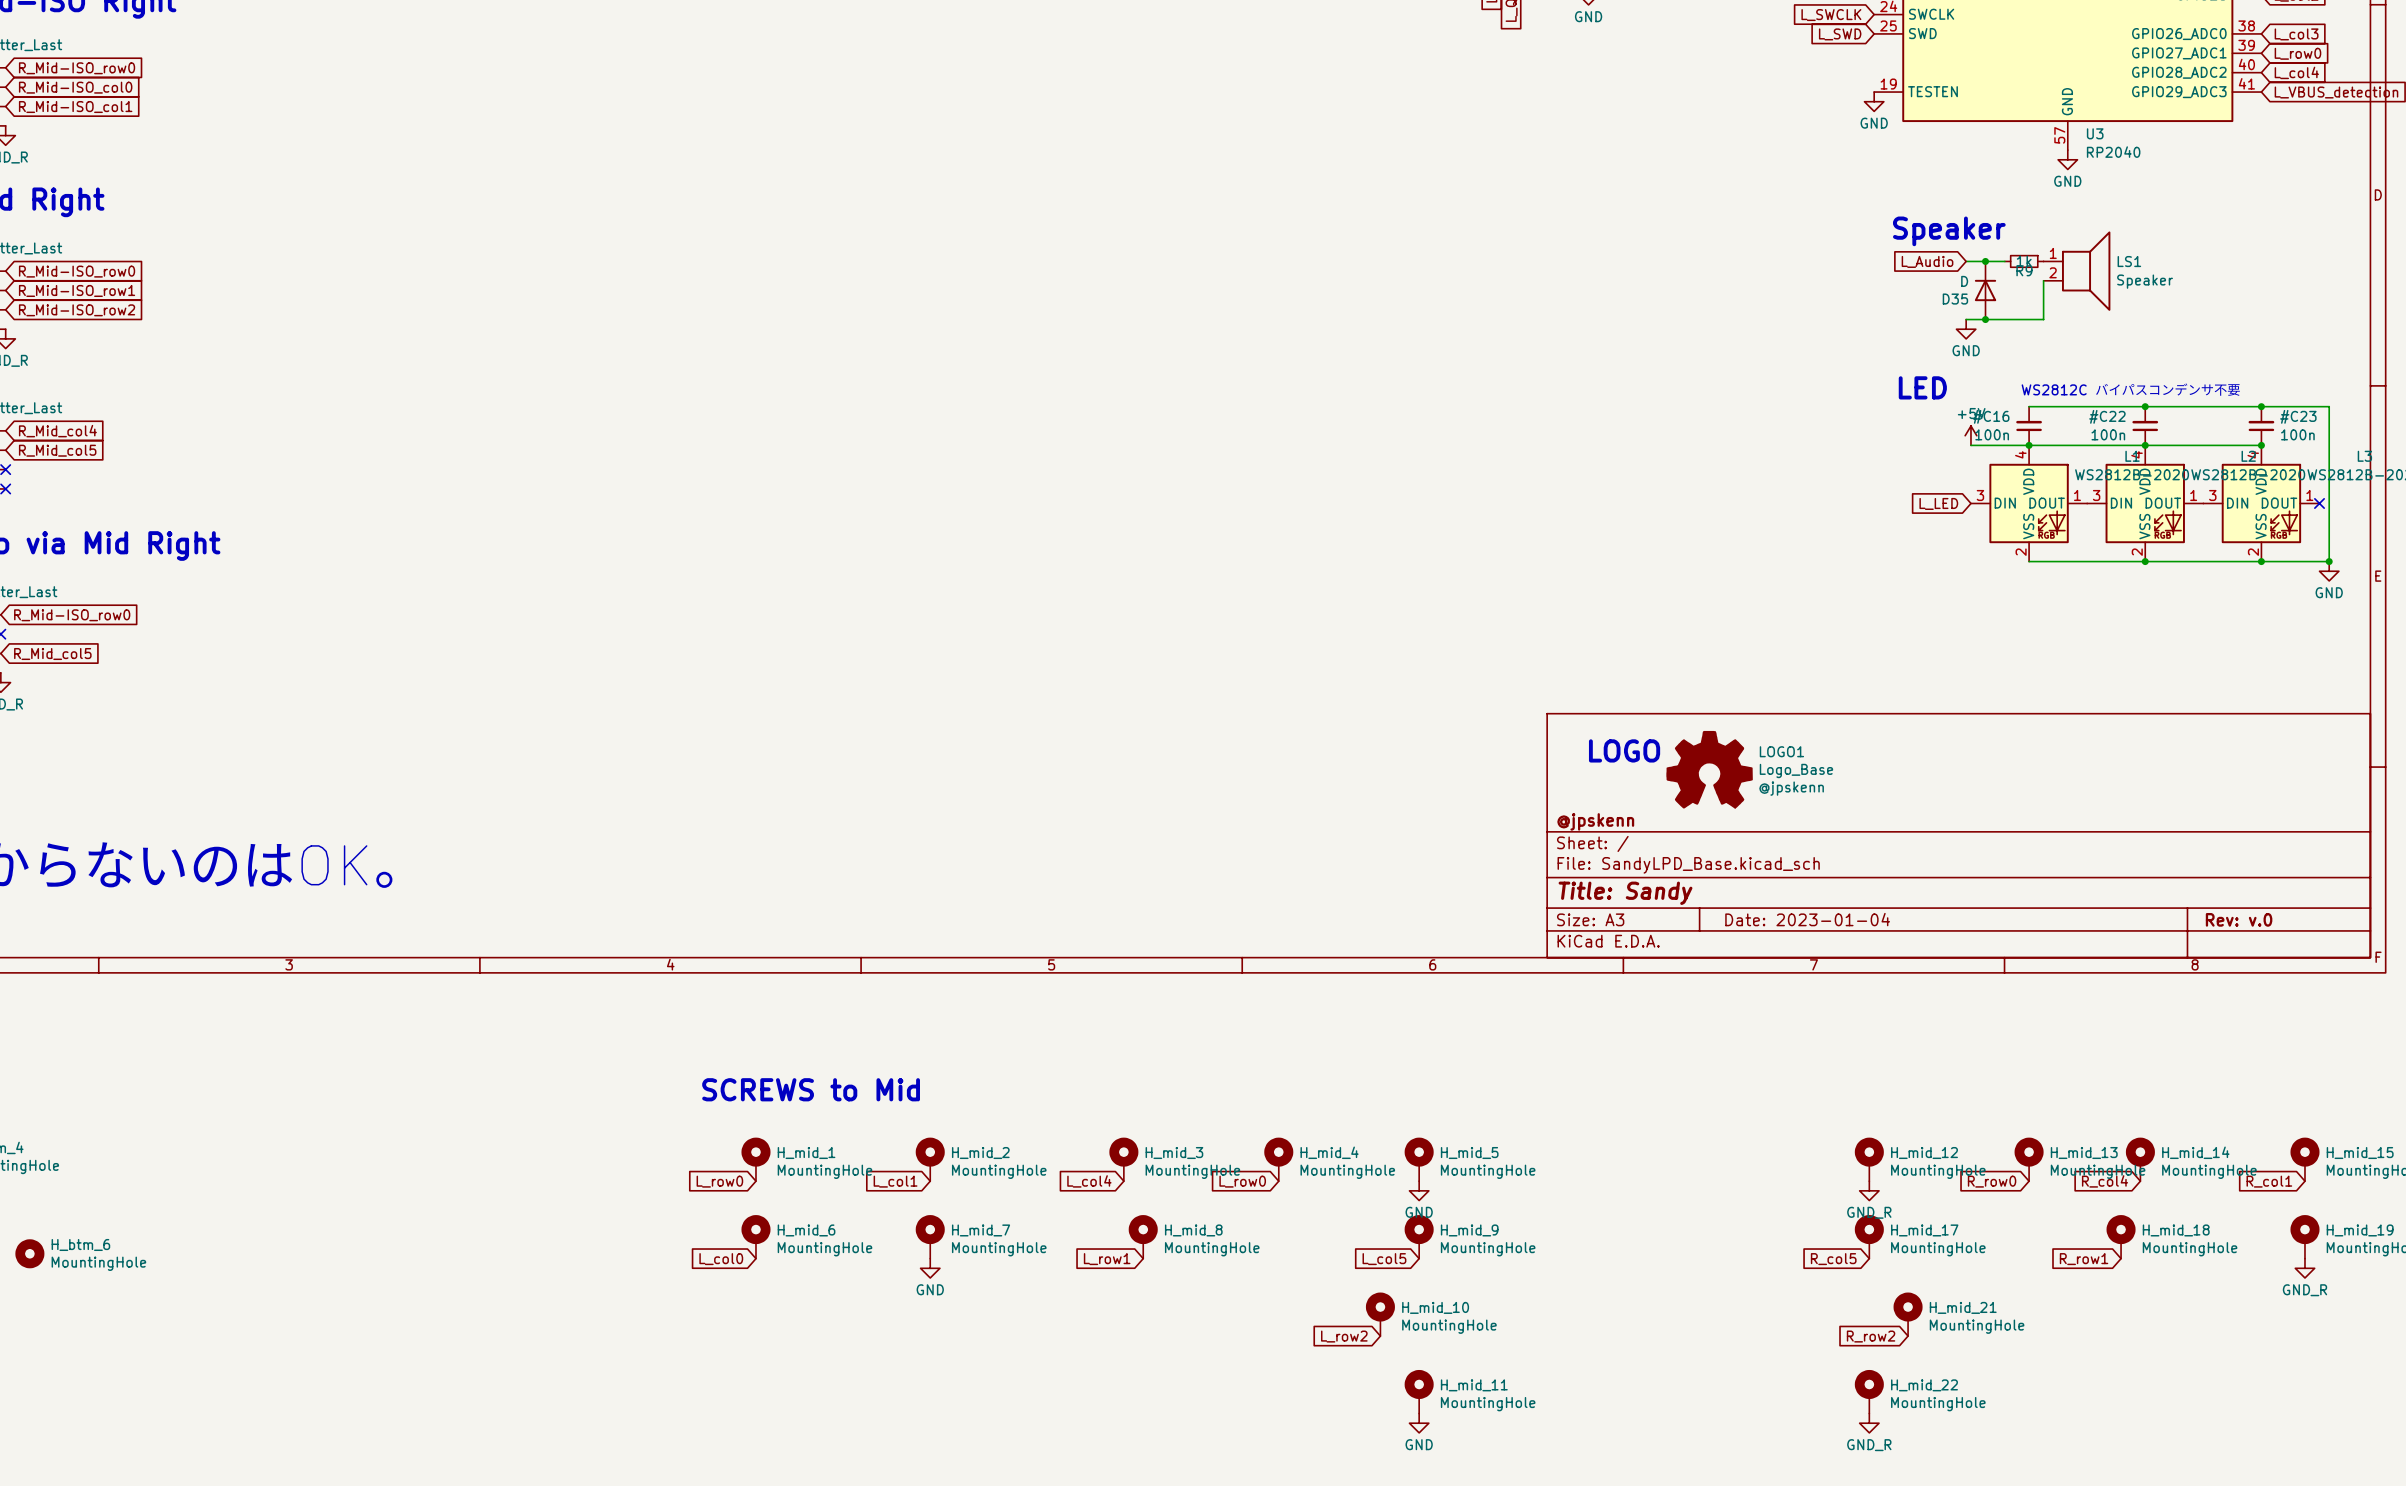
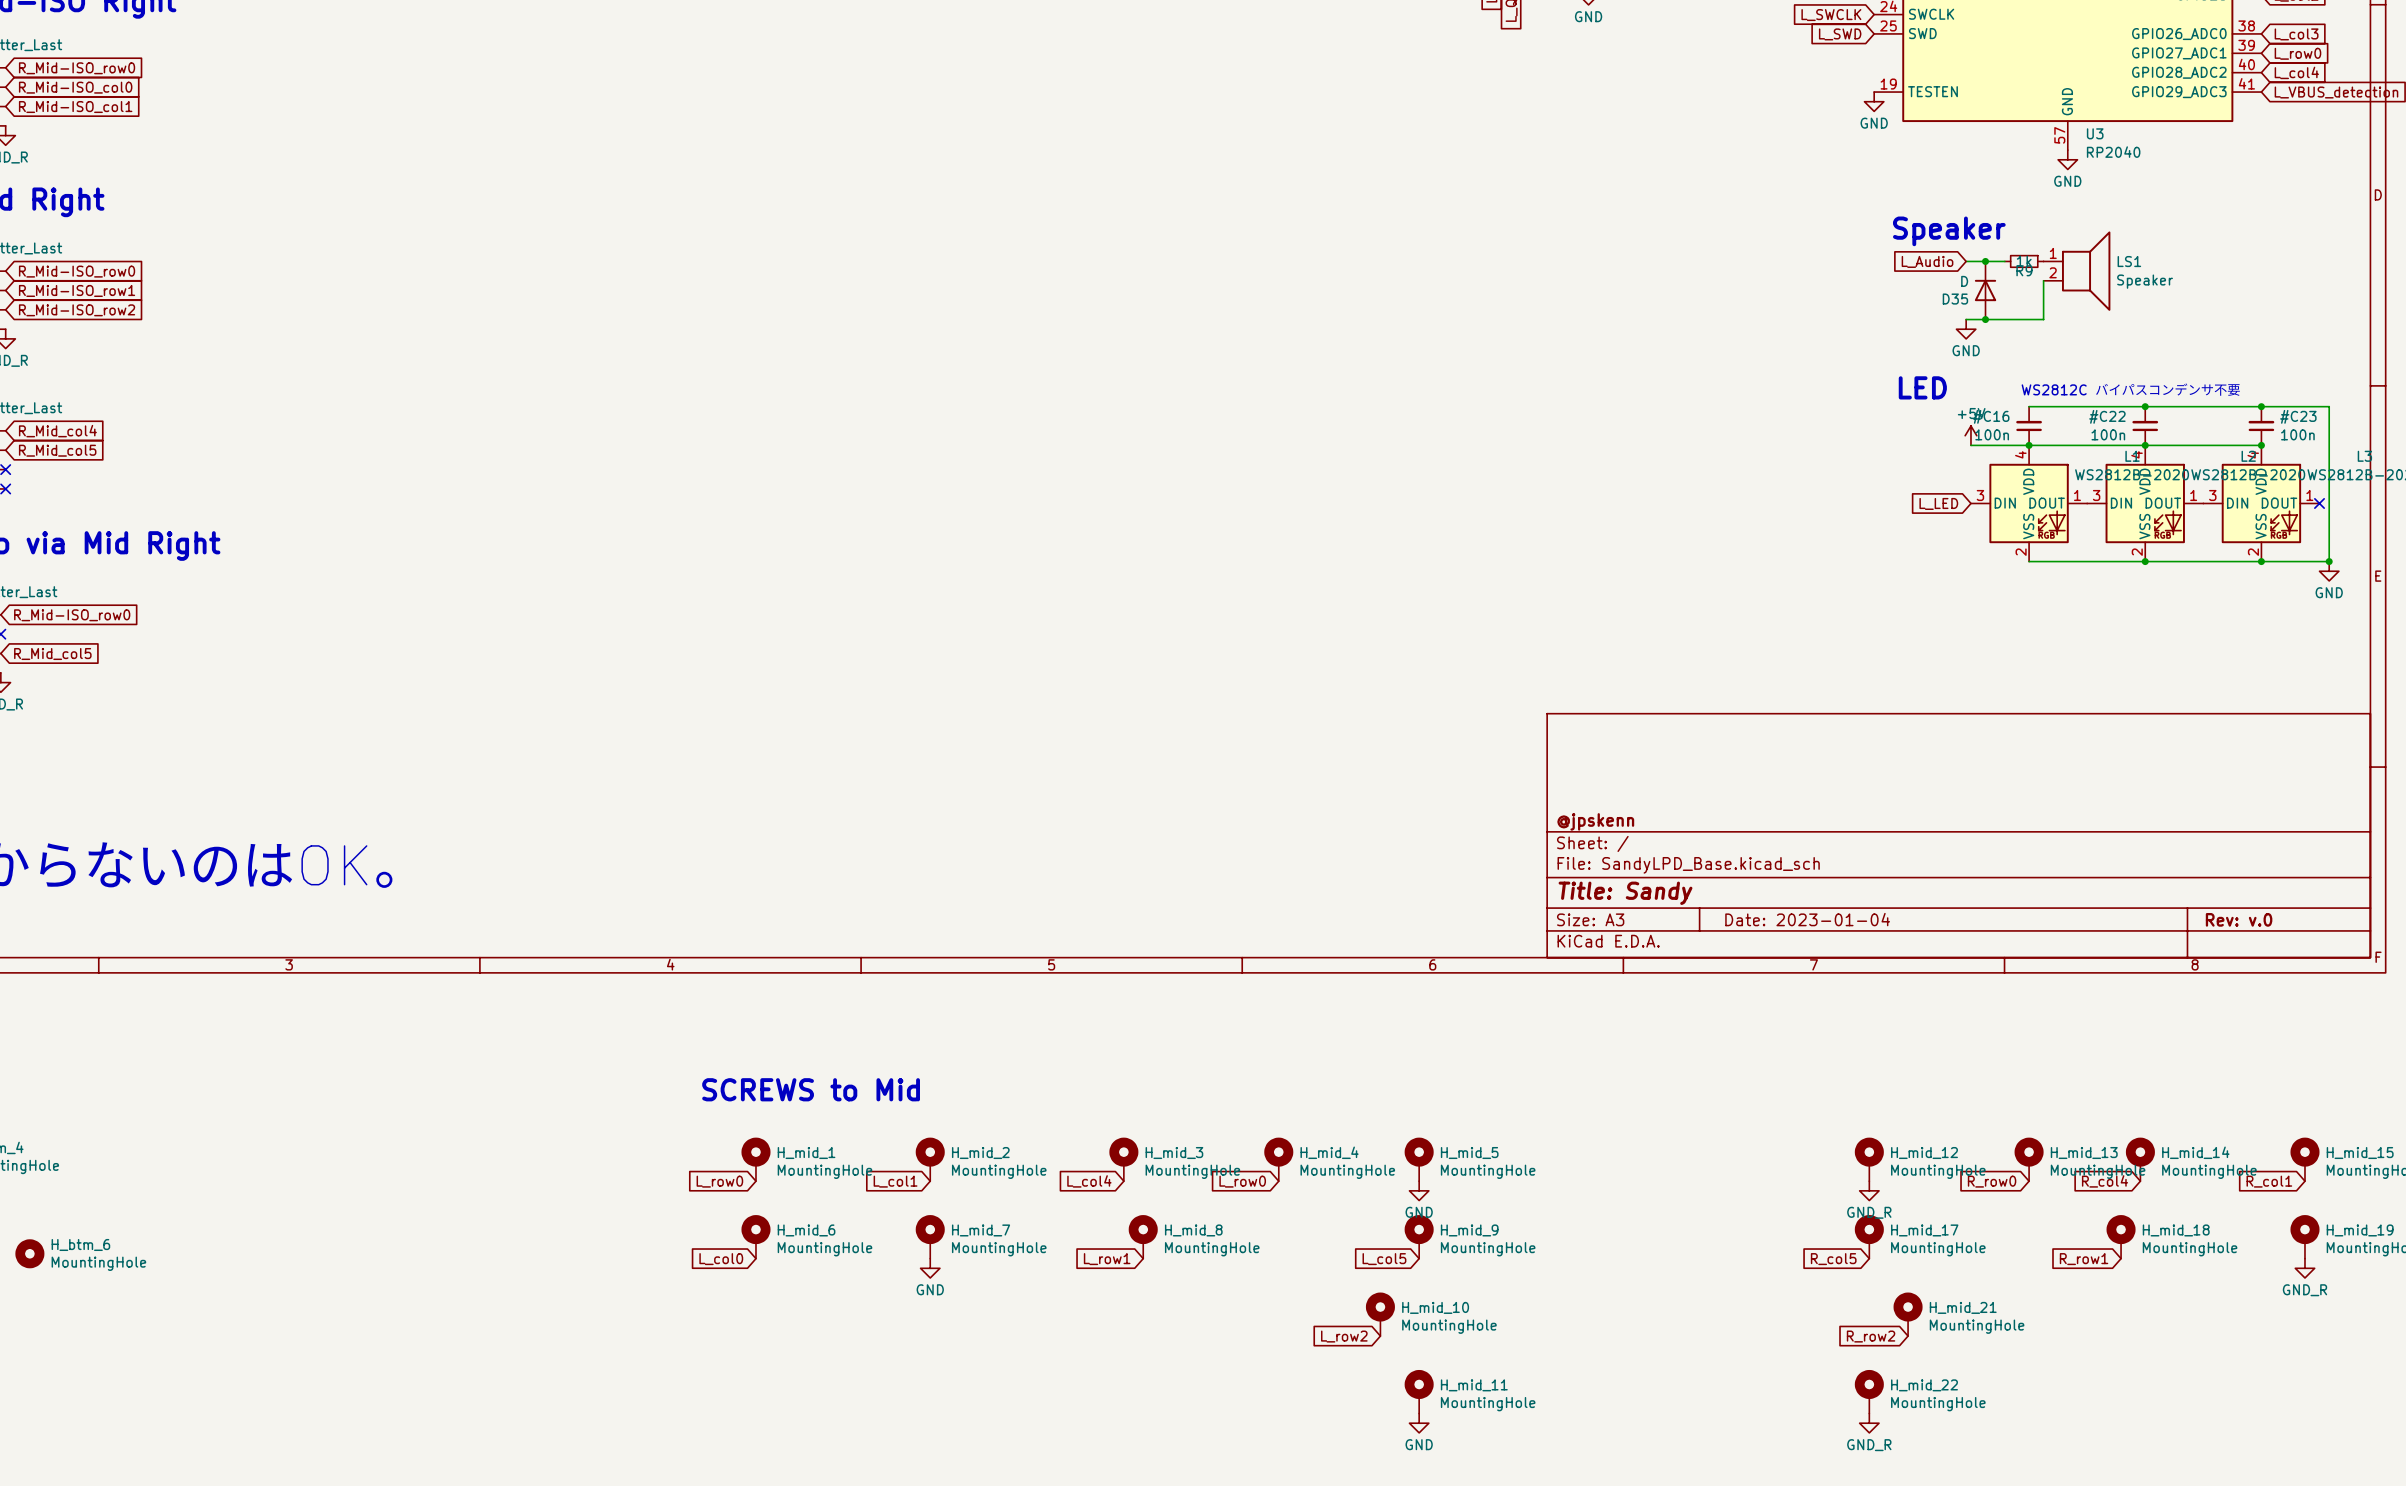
text: LOGO (1624, 750) -> none
LOGO1: Logo_Base (1709, 769) -> none

